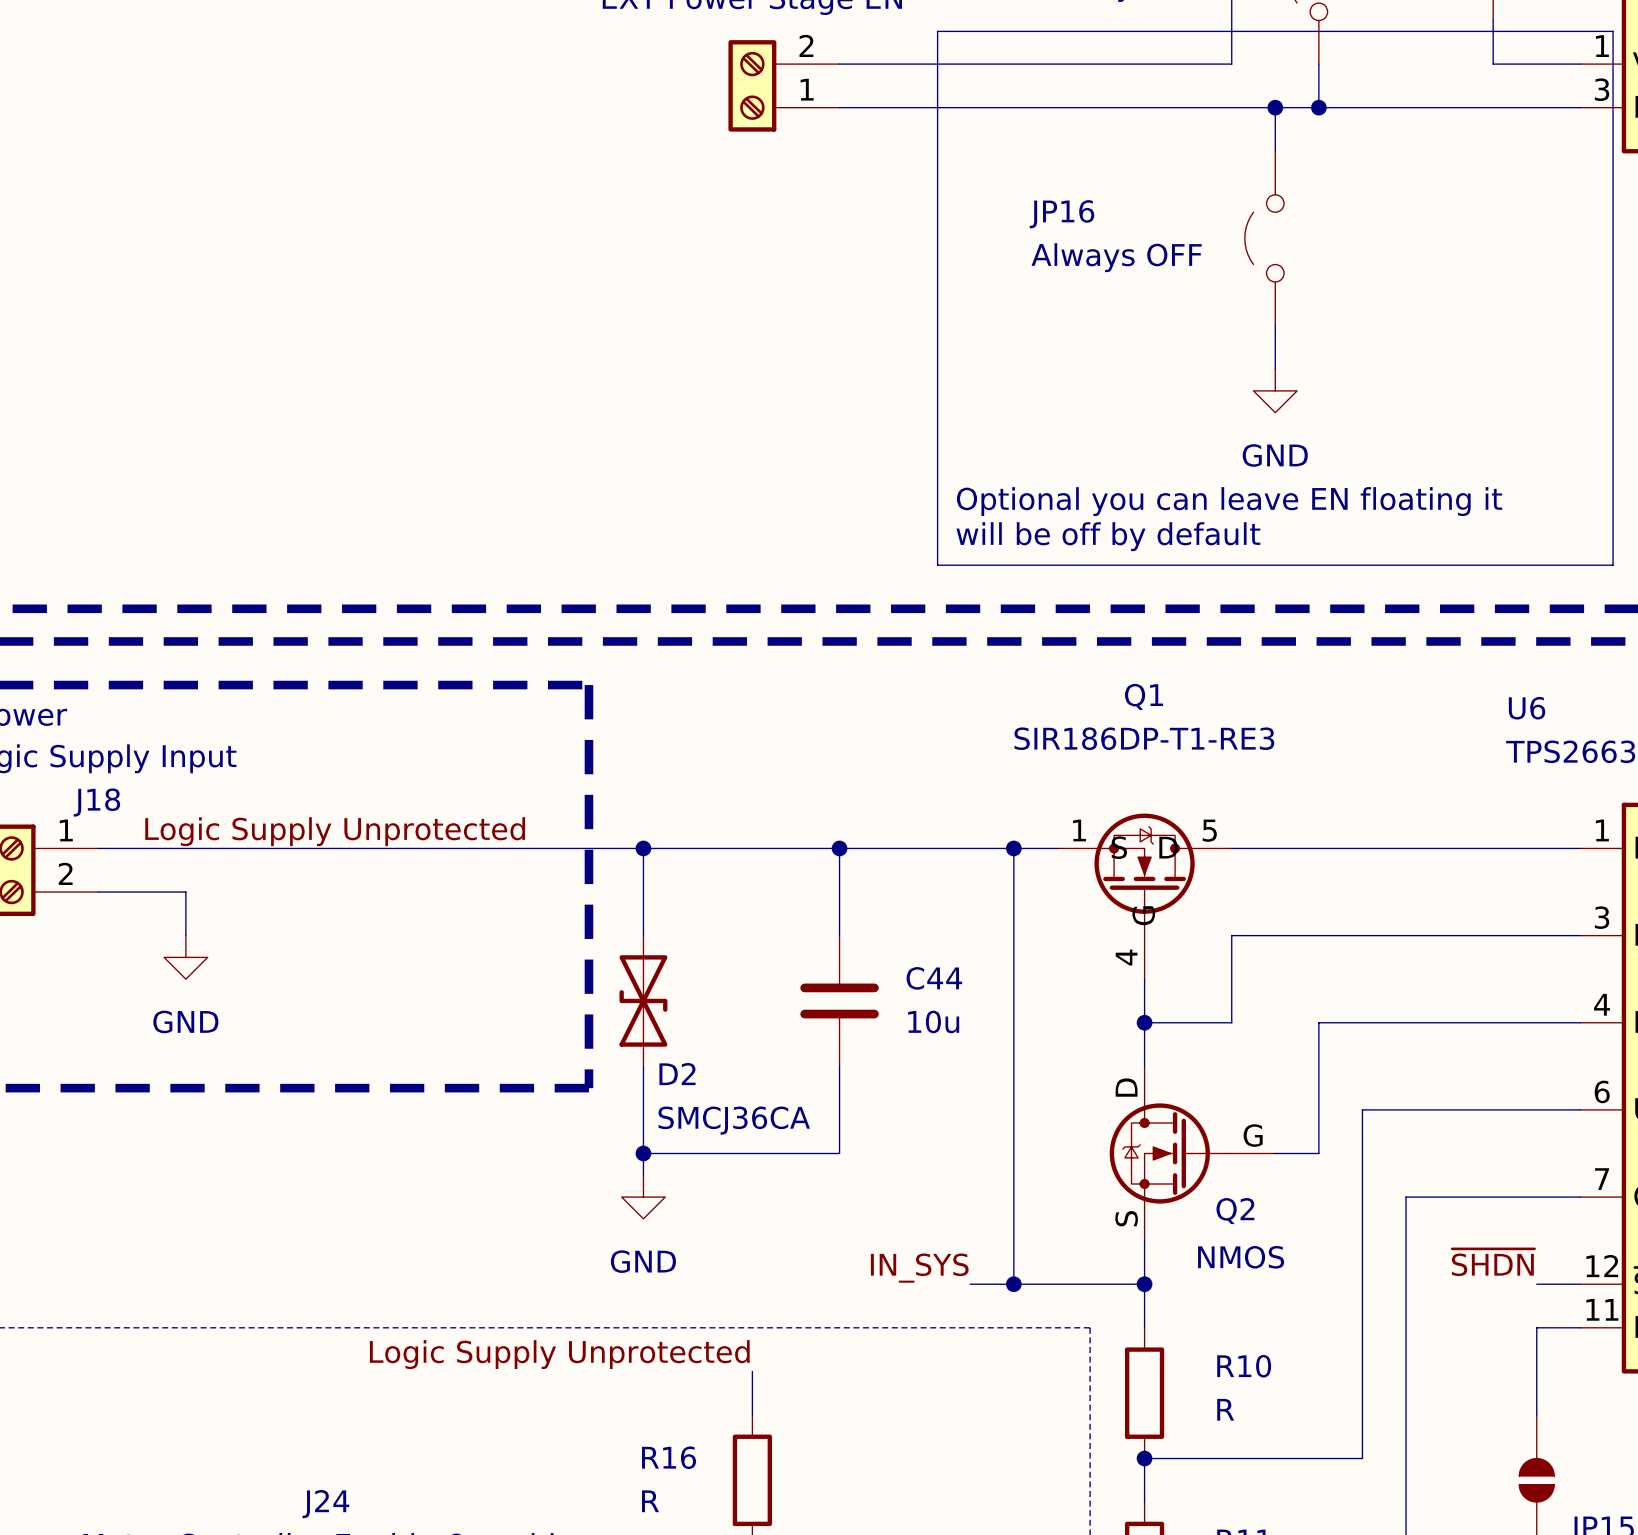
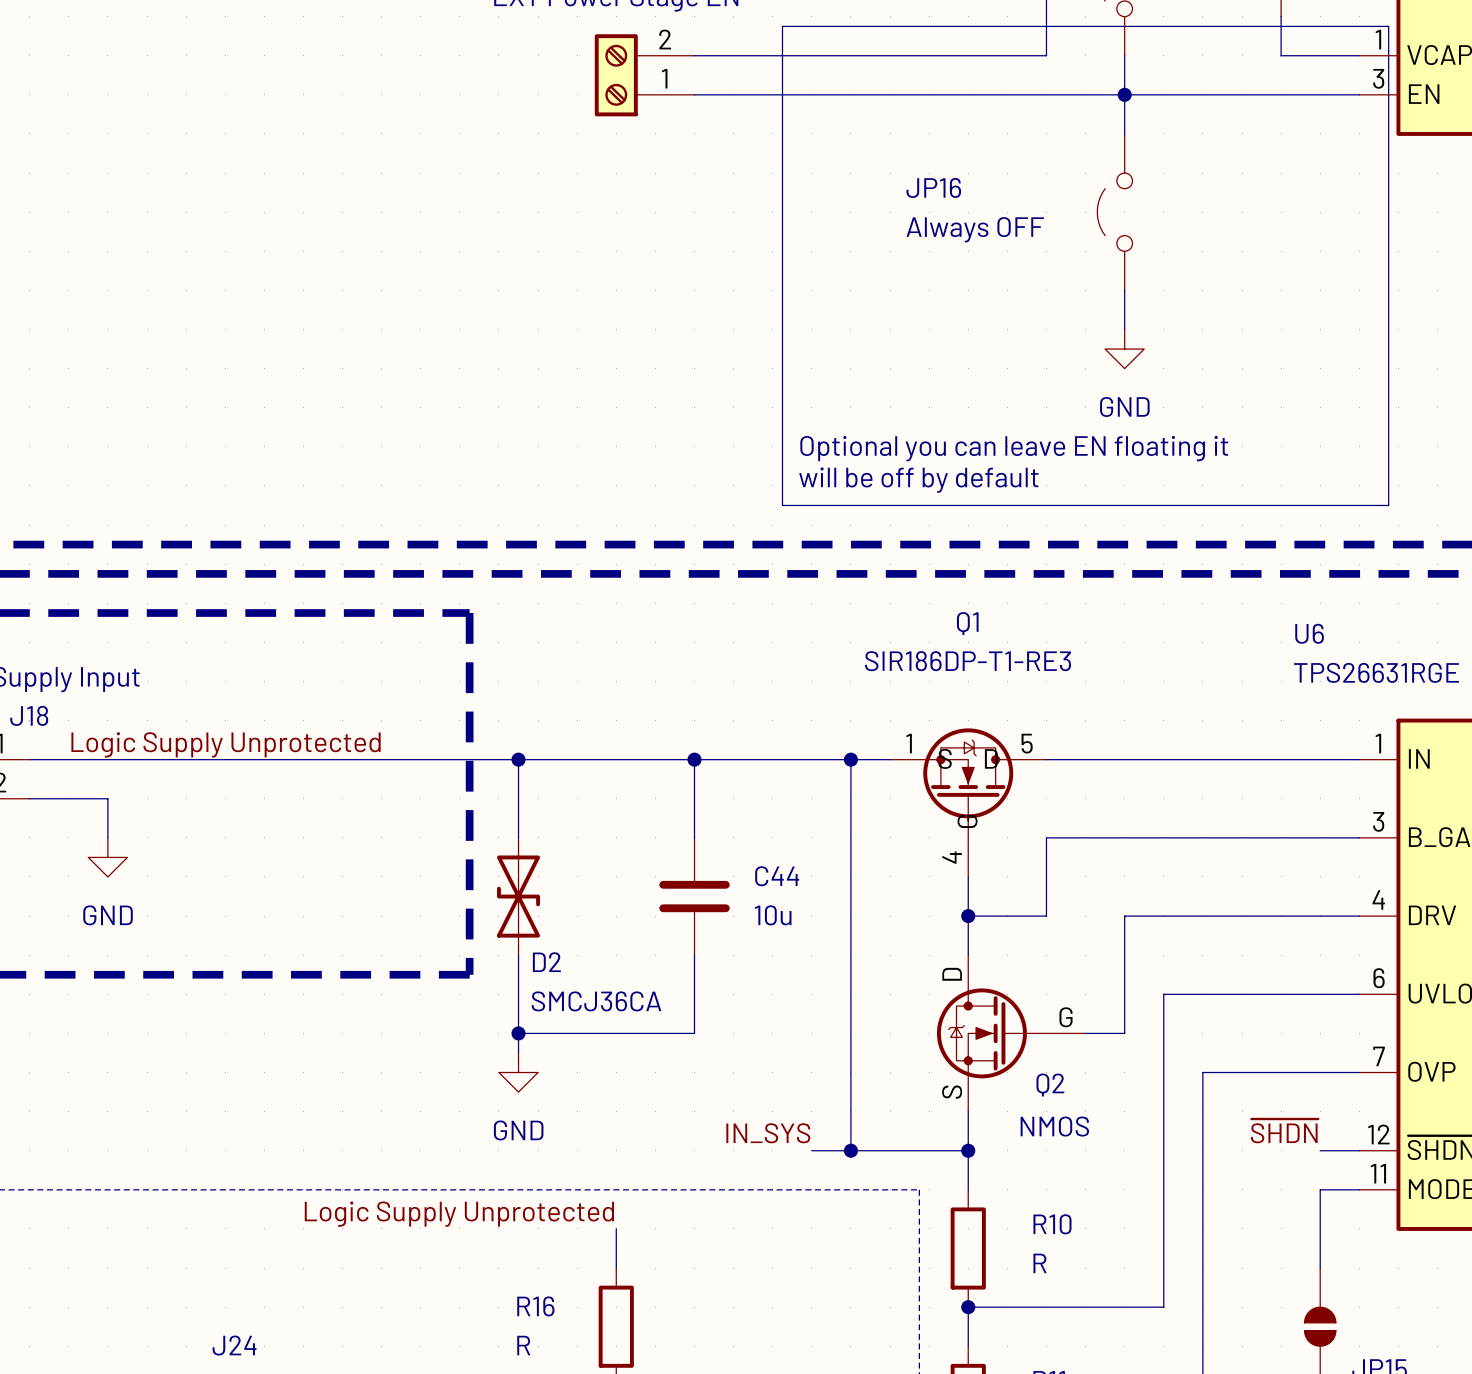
wire: (1275, 107) (1275, 151) -> (1124, 94) (1124, 133)
junction: (1275, 107) -> none
JP16 position: (1264, 238) -> (1114, 212)
wire: (1275, 325) (1275, 369) -> (1124, 290) (1124, 329)
power symbol position: GND (1275, 390) -> GND (1124, 349)

